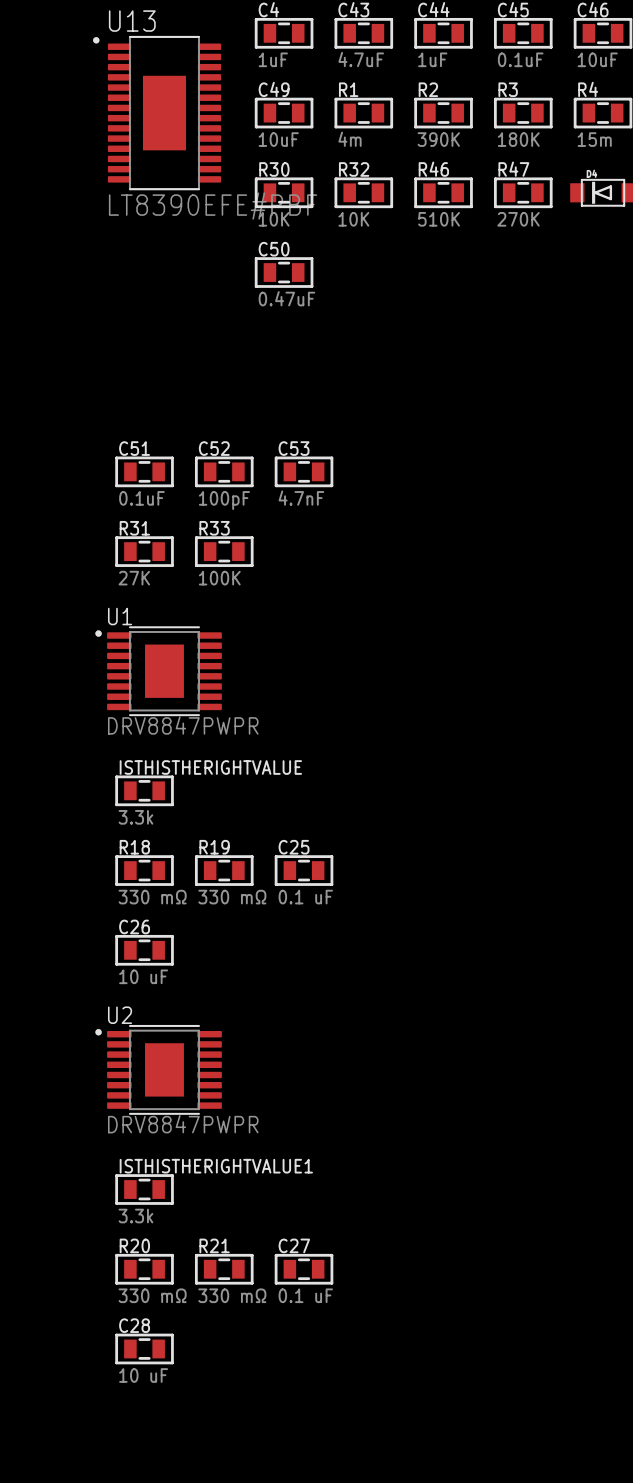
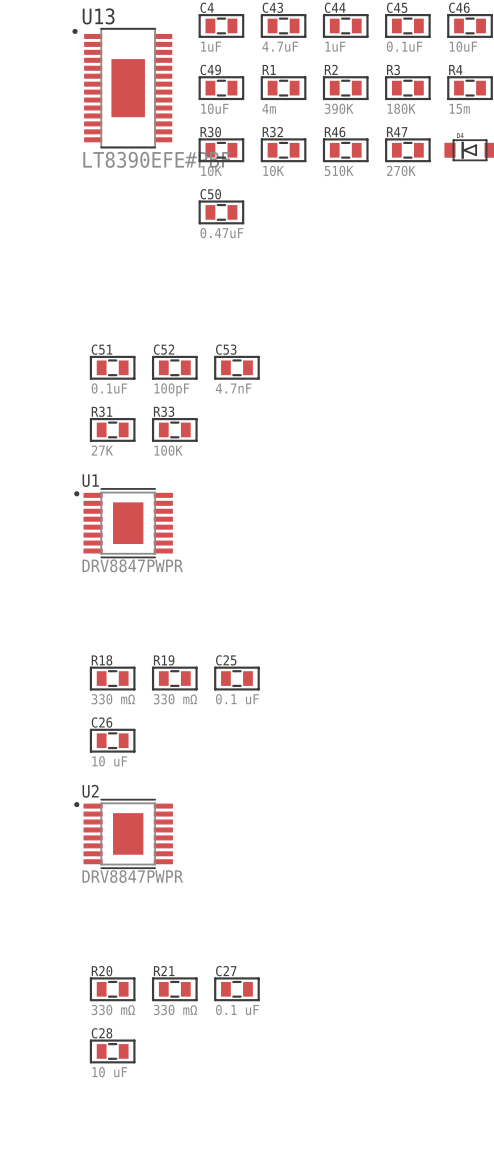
ISTHISTHERIGHTVALUE: 3.3k (144, 790) -> none
ISTHISTHERIGHTVALUE1: 3.3k (144, 1189) -> none

